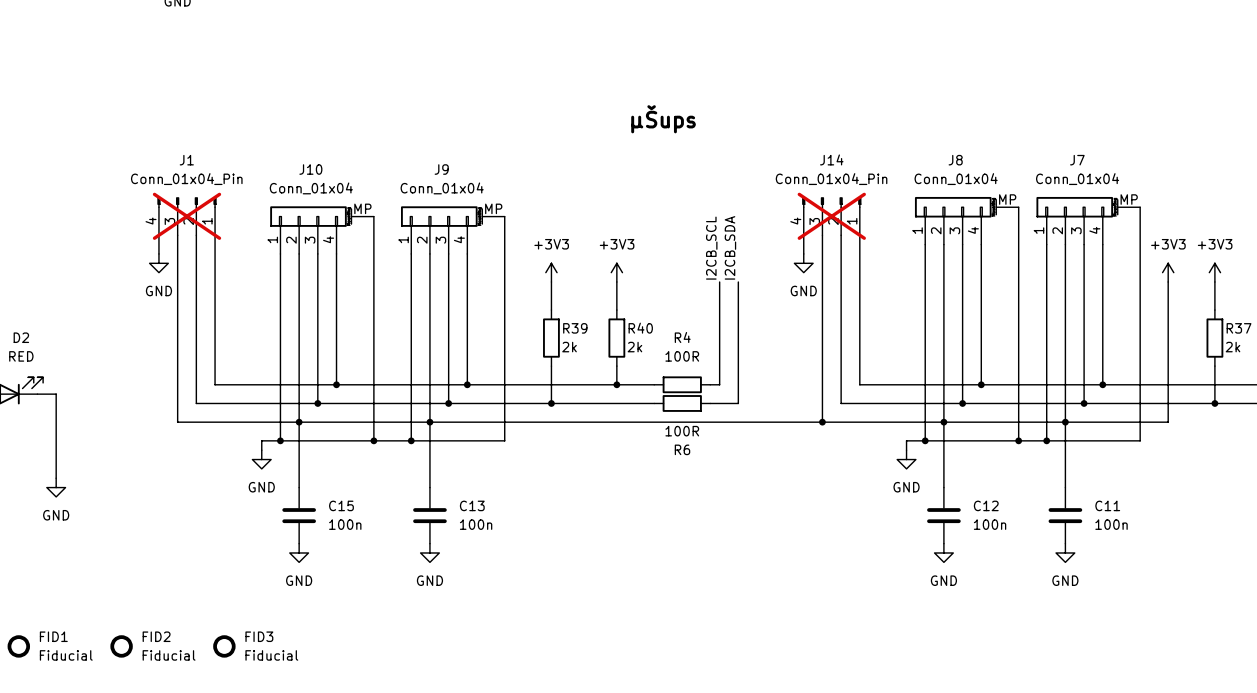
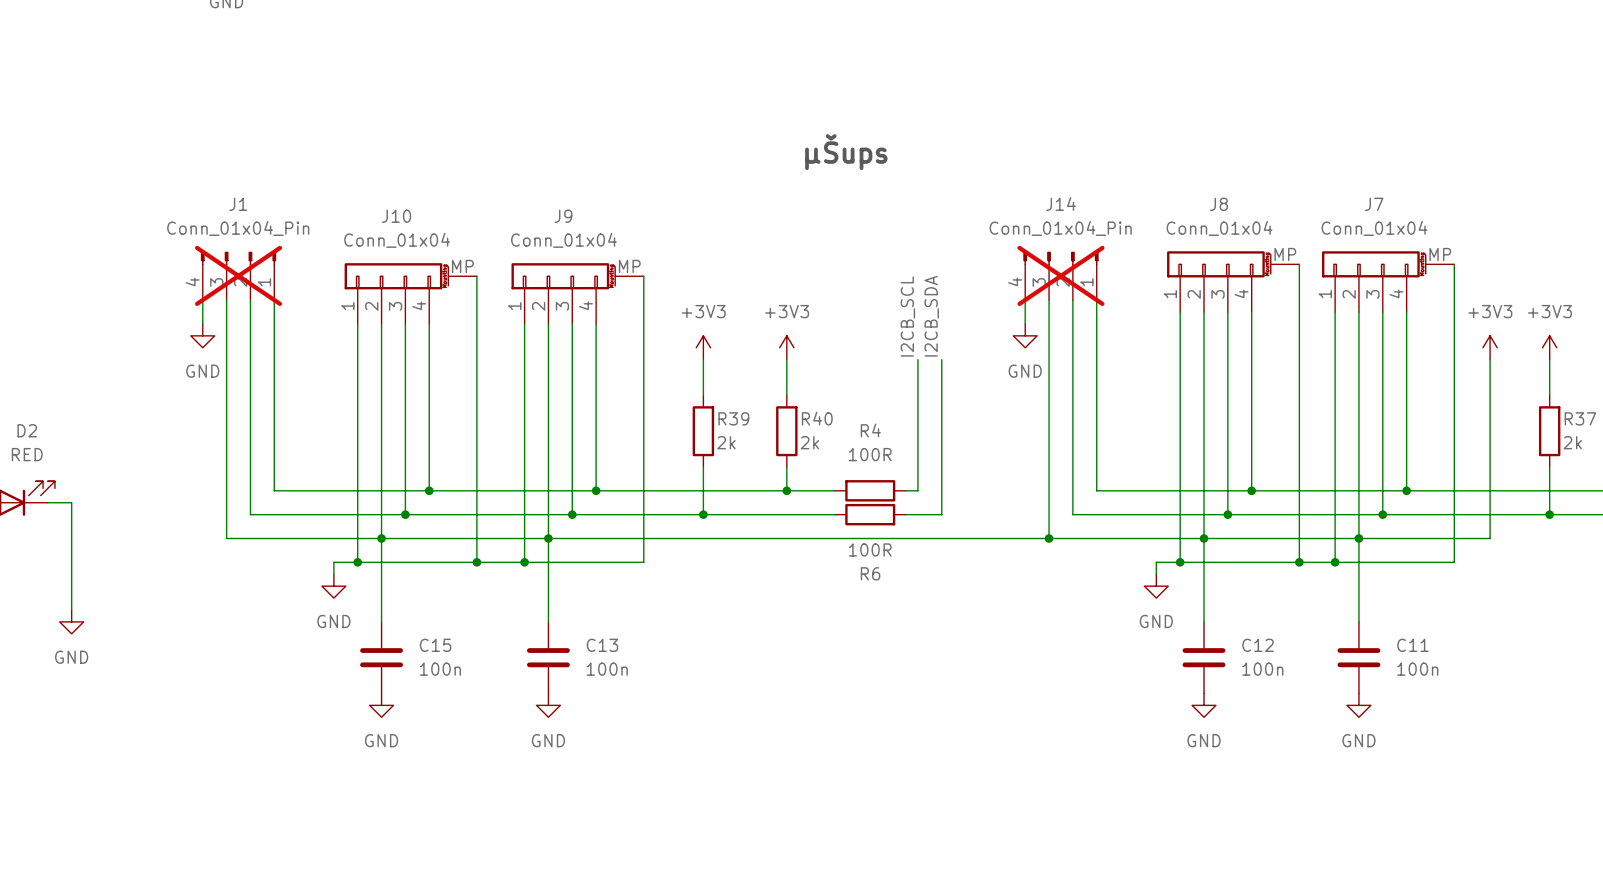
FID1: Fiducial (18, 646) -> none
FID2: Fiducial (121, 646) -> none
FID3: Fiducial (224, 646) -> none

